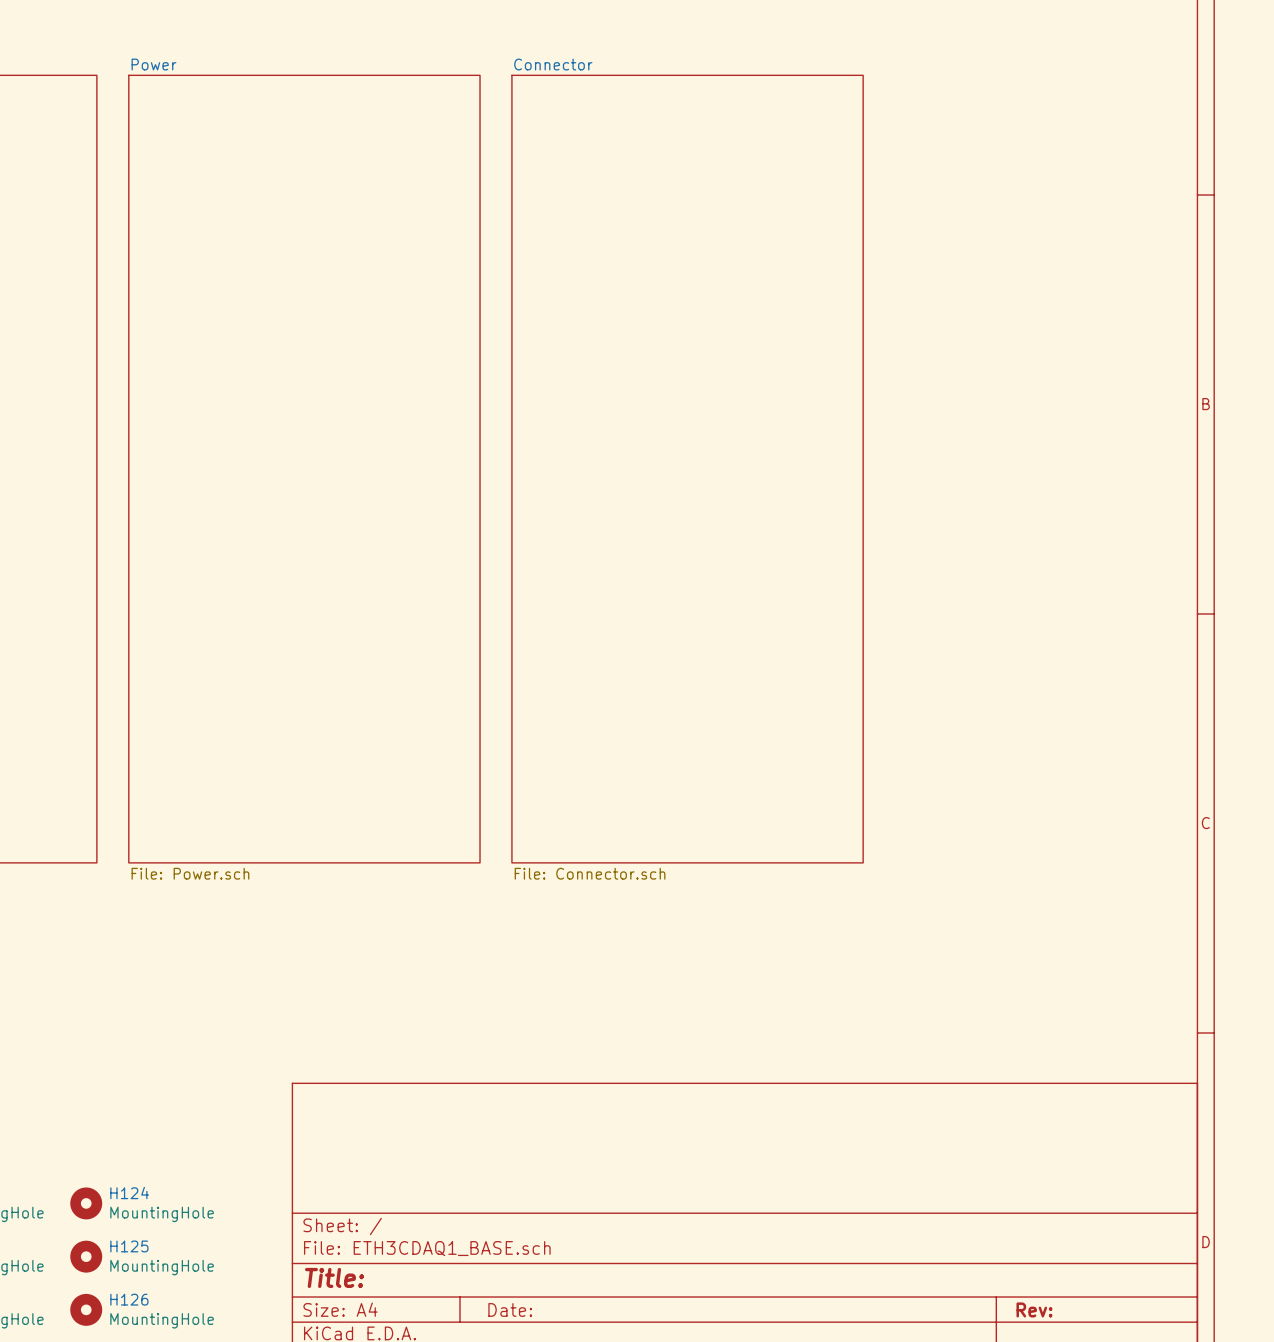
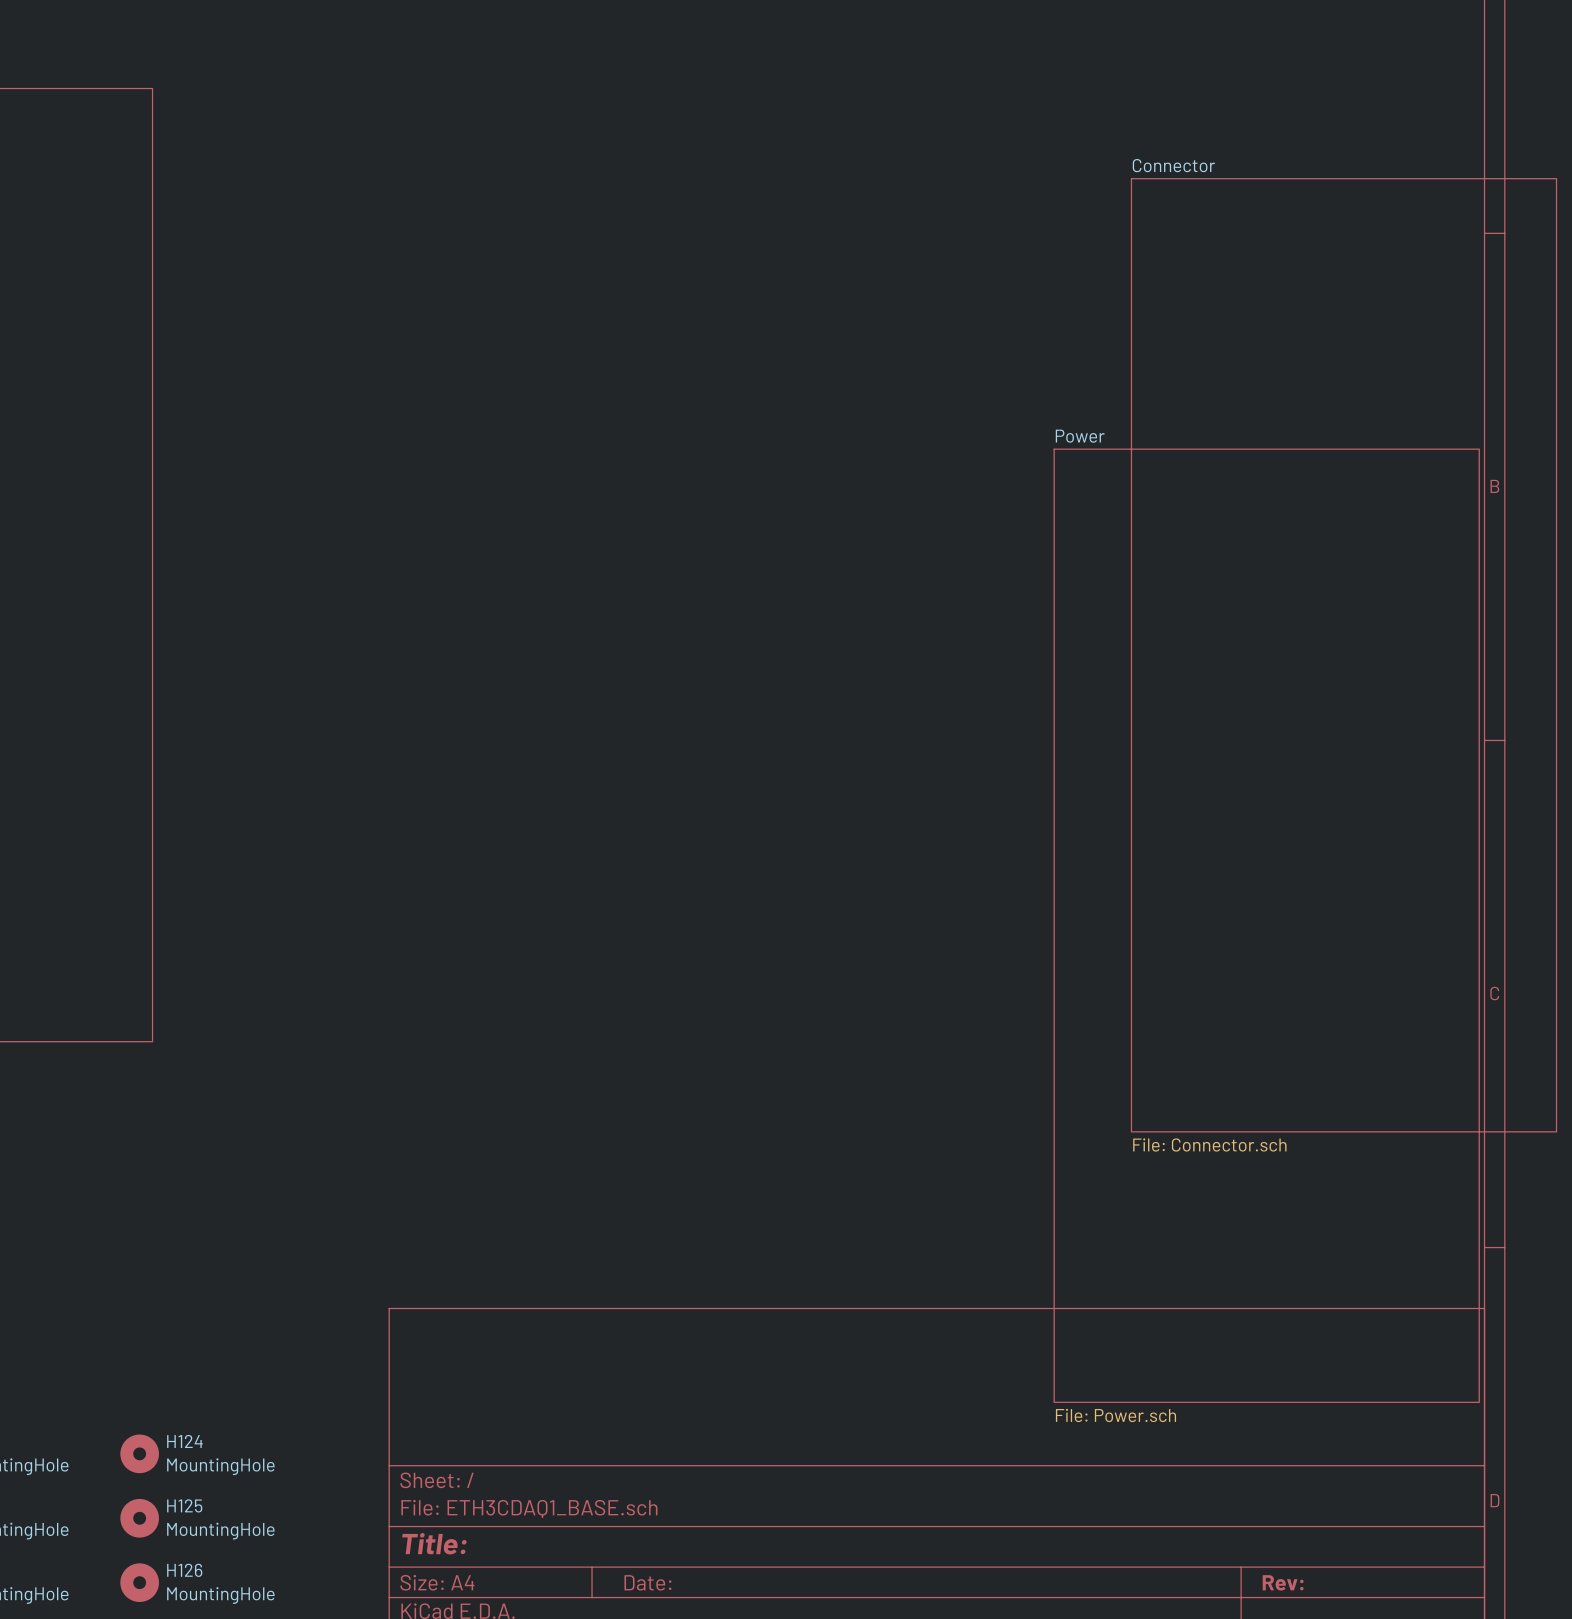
sheet Power: File: Power.sch (304, 469) -> none
sheet Connector: File: Connector.sch (687, 469) -> none
sheet Connector: none -> File: Connector.sch (1343, 655)
sheet Power: none -> File: Power.sch (1266, 925)

